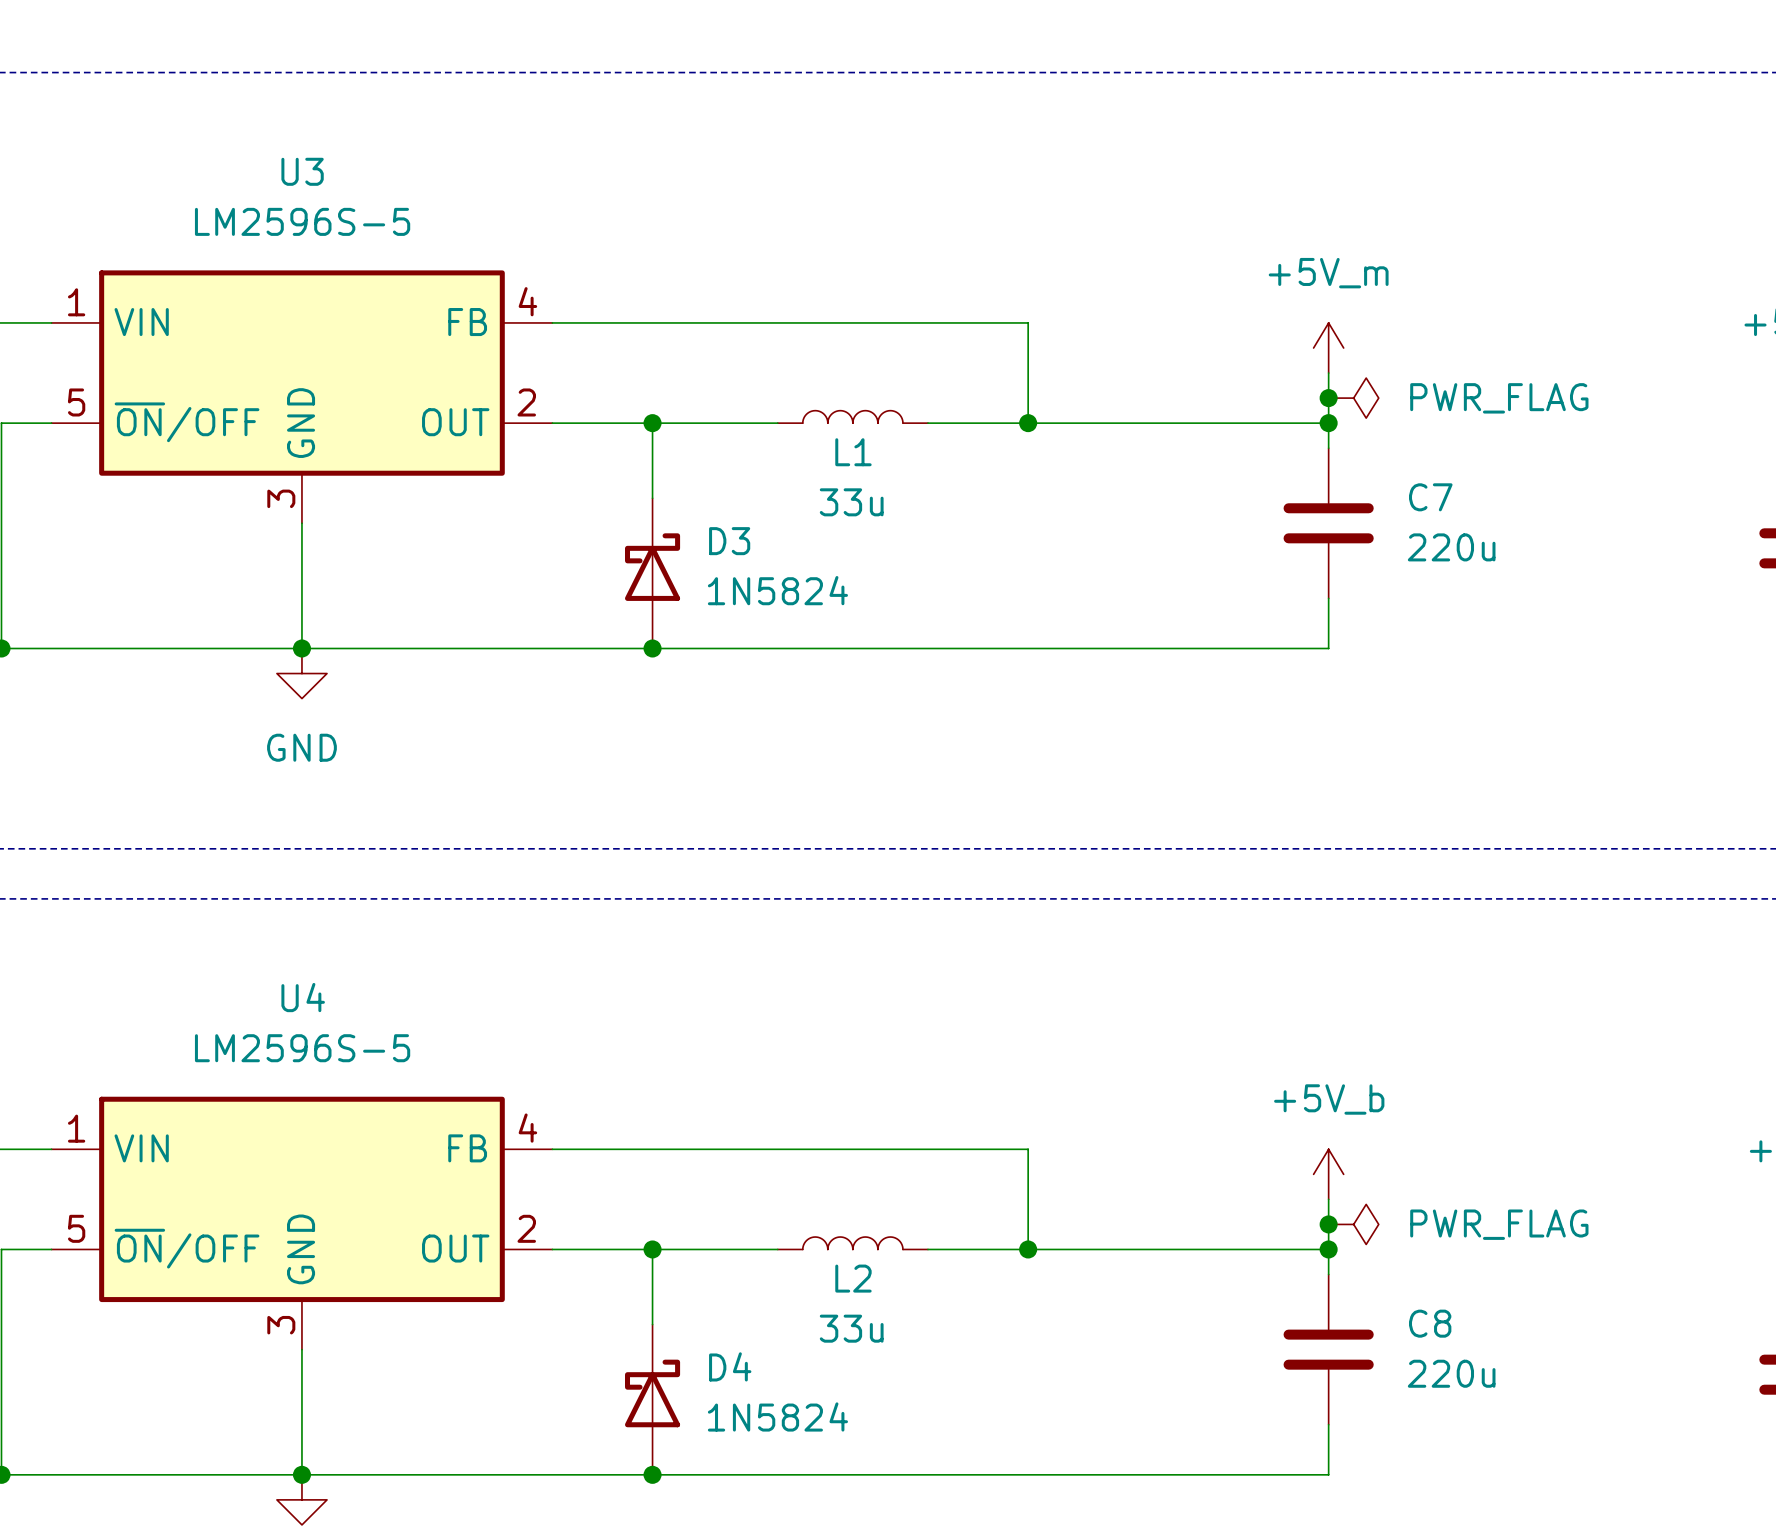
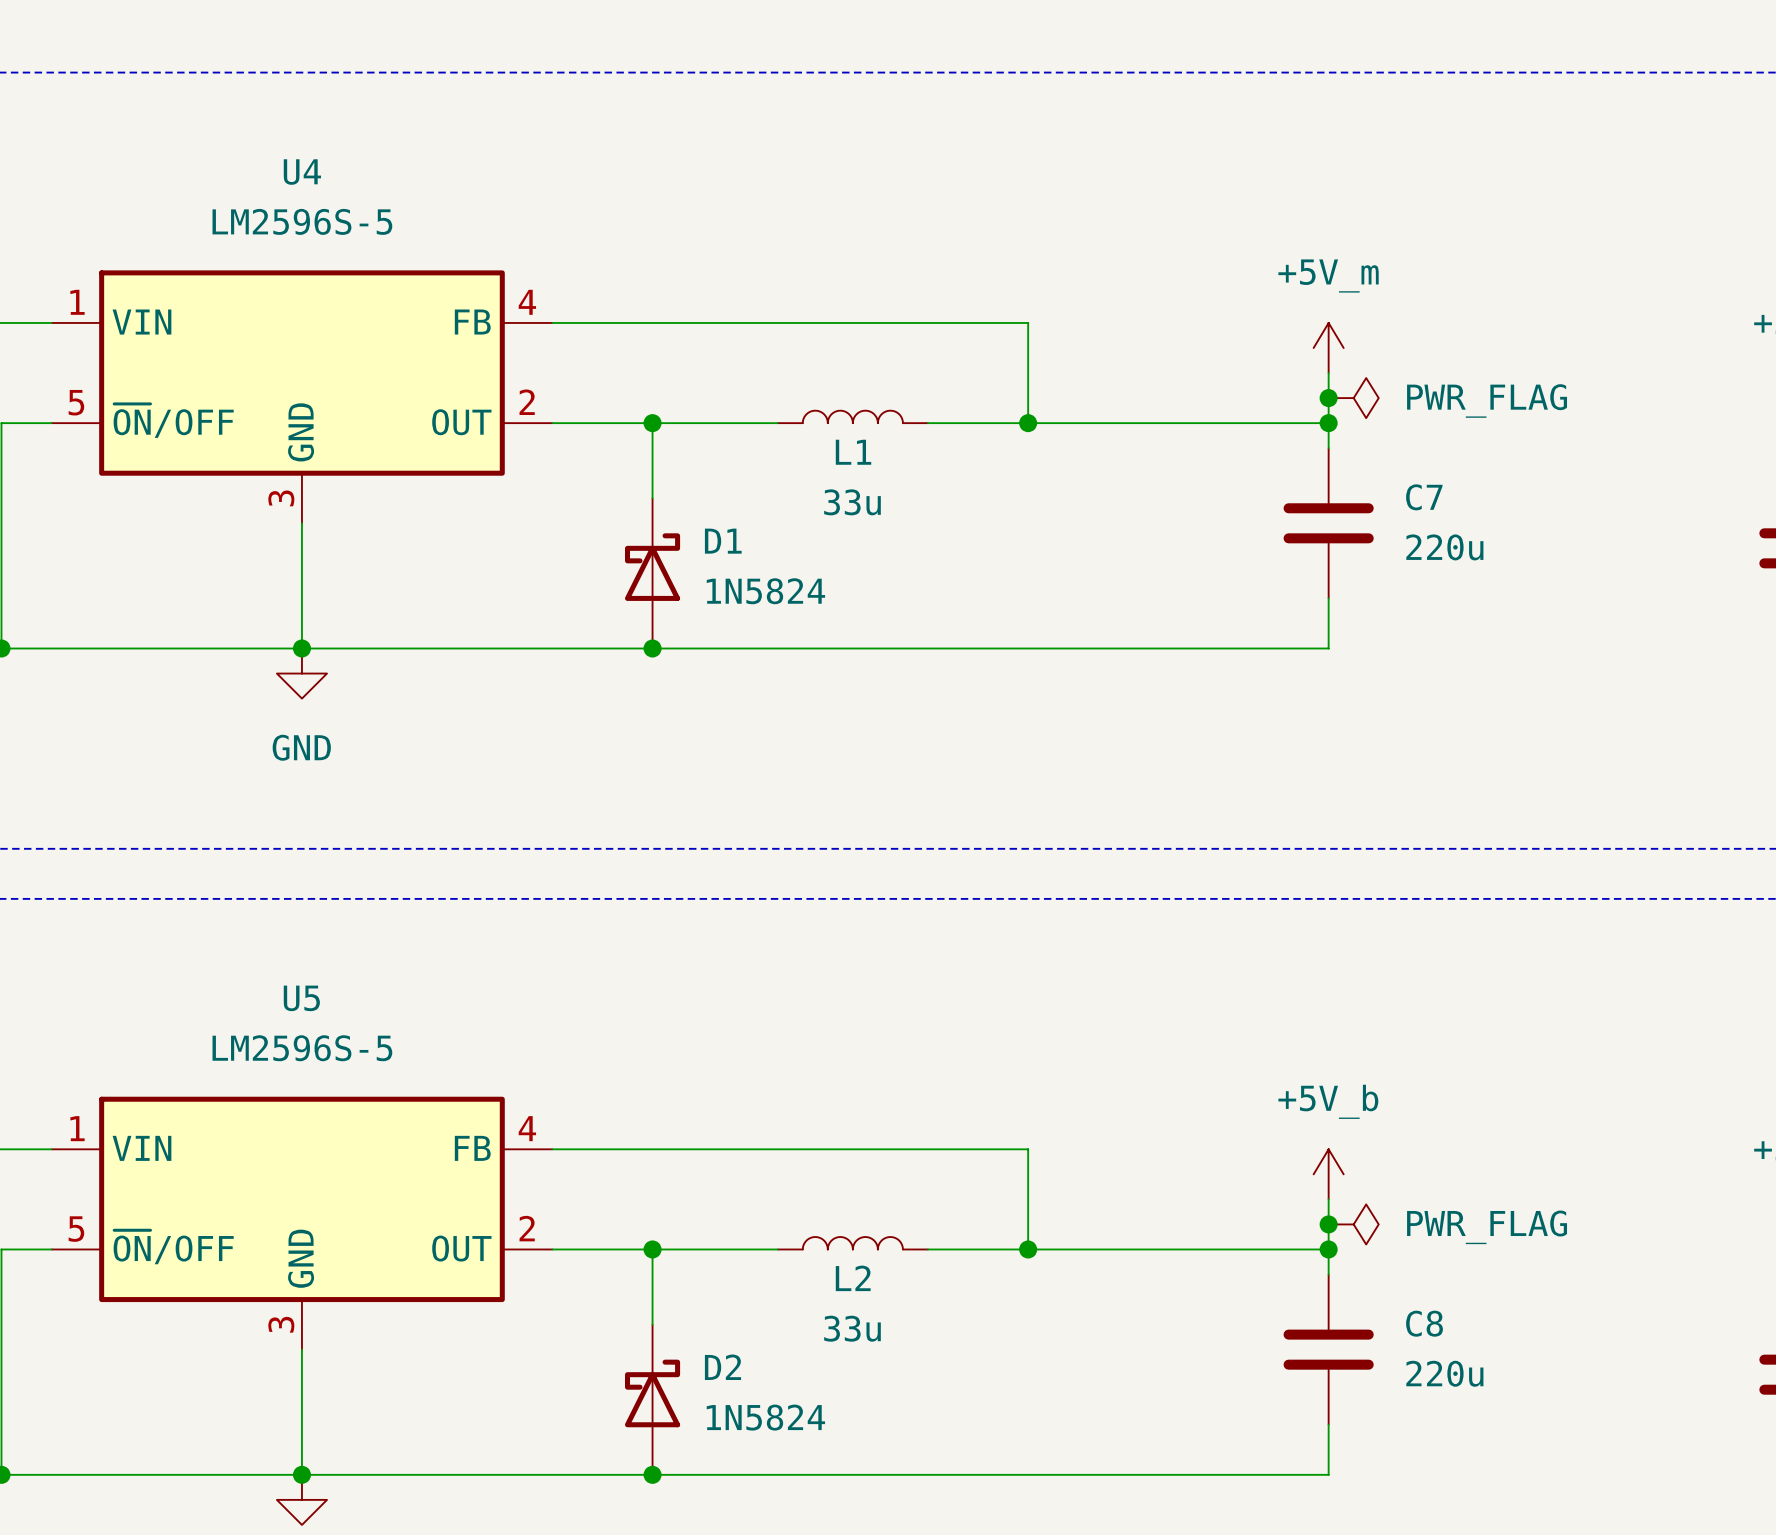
U3 name: U3 (302, 171) -> U4 (302, 172)
D3 name: D3 (729, 541) -> D1 (723, 541)
U4 name: U4 (303, 997) -> U5 (301, 998)
D4 name: D4 (730, 1366) -> D2 (722, 1367)

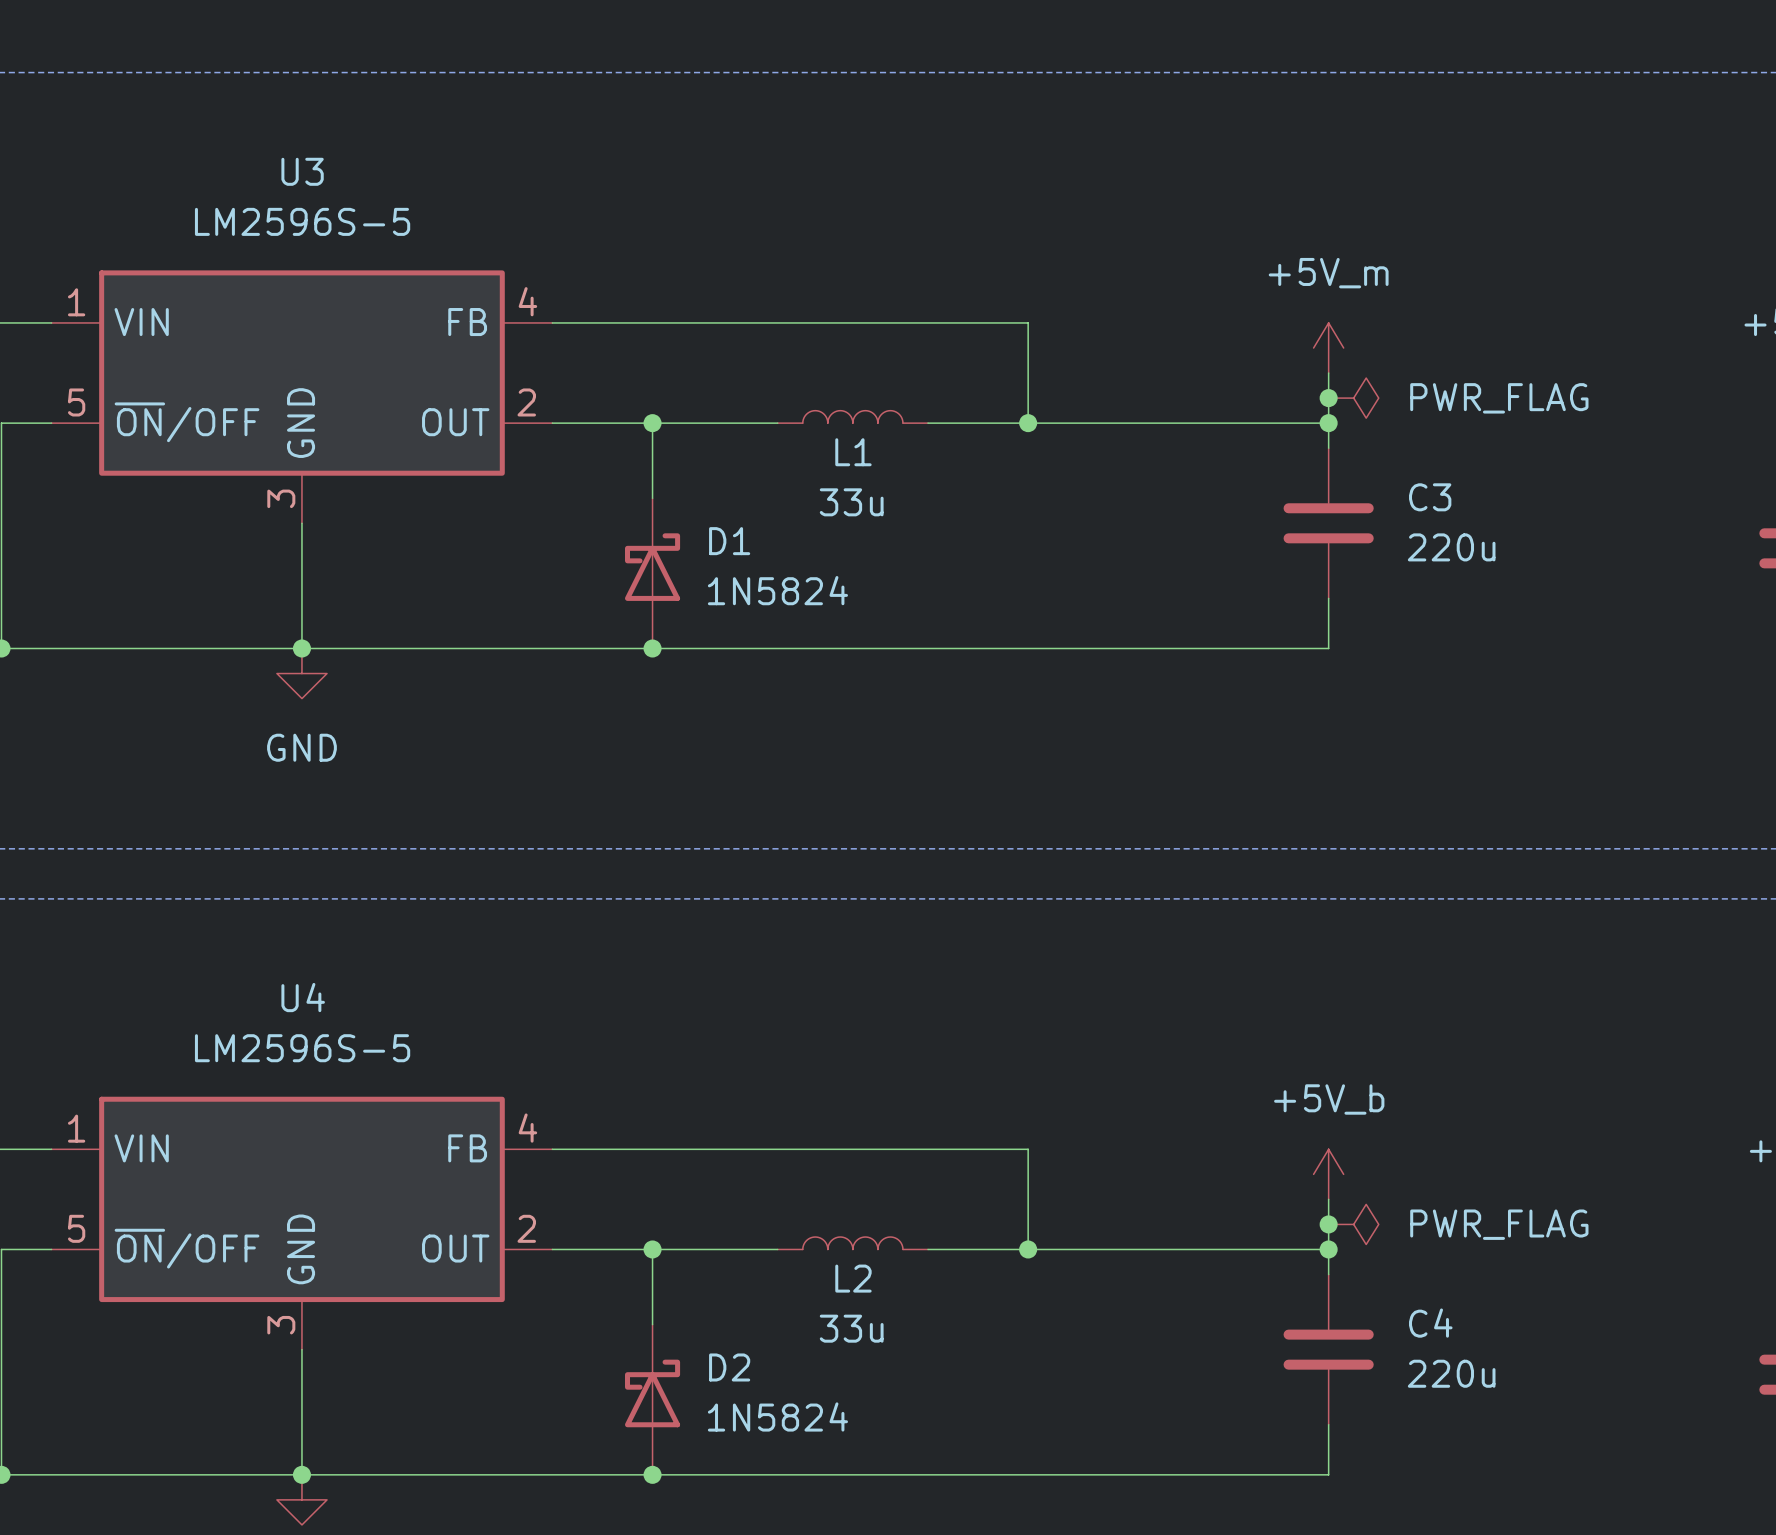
U4 name: U4 (302, 172) -> U3 (302, 171)
C7 name: C7 (1424, 497) -> C3 (1430, 497)
U5 name: U5 (301, 998) -> U4 (303, 997)
C8 name: C8 (1424, 1323) -> C4 (1430, 1323)

